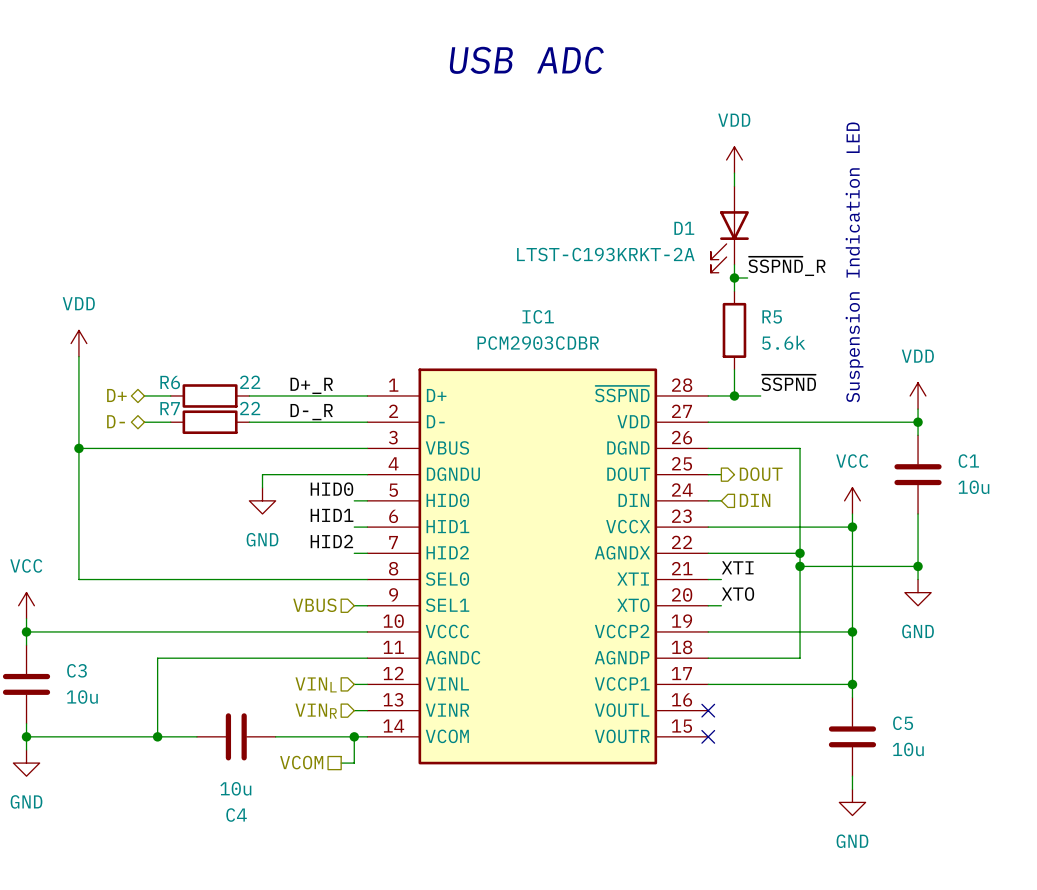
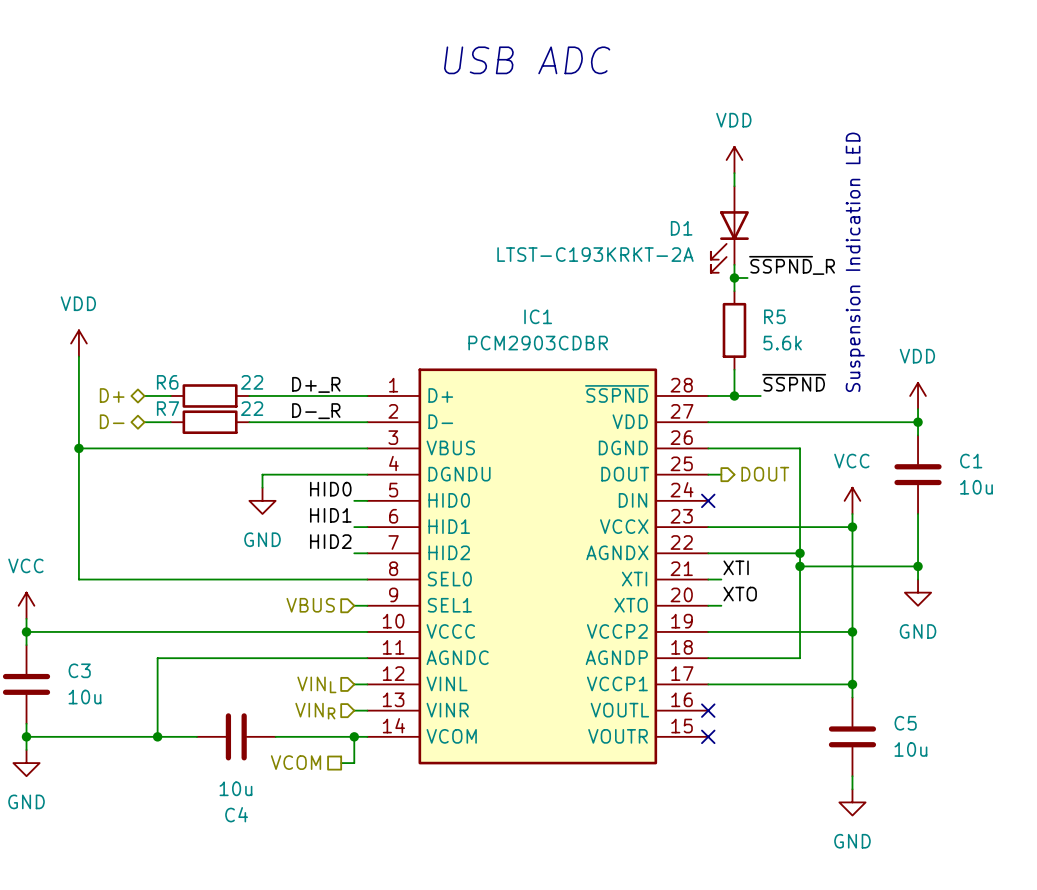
wire: (708, 500) (721, 500) -> none
no-connect mark: none -> (708, 500)
hierarchical label: DIN (755, 500) -> none

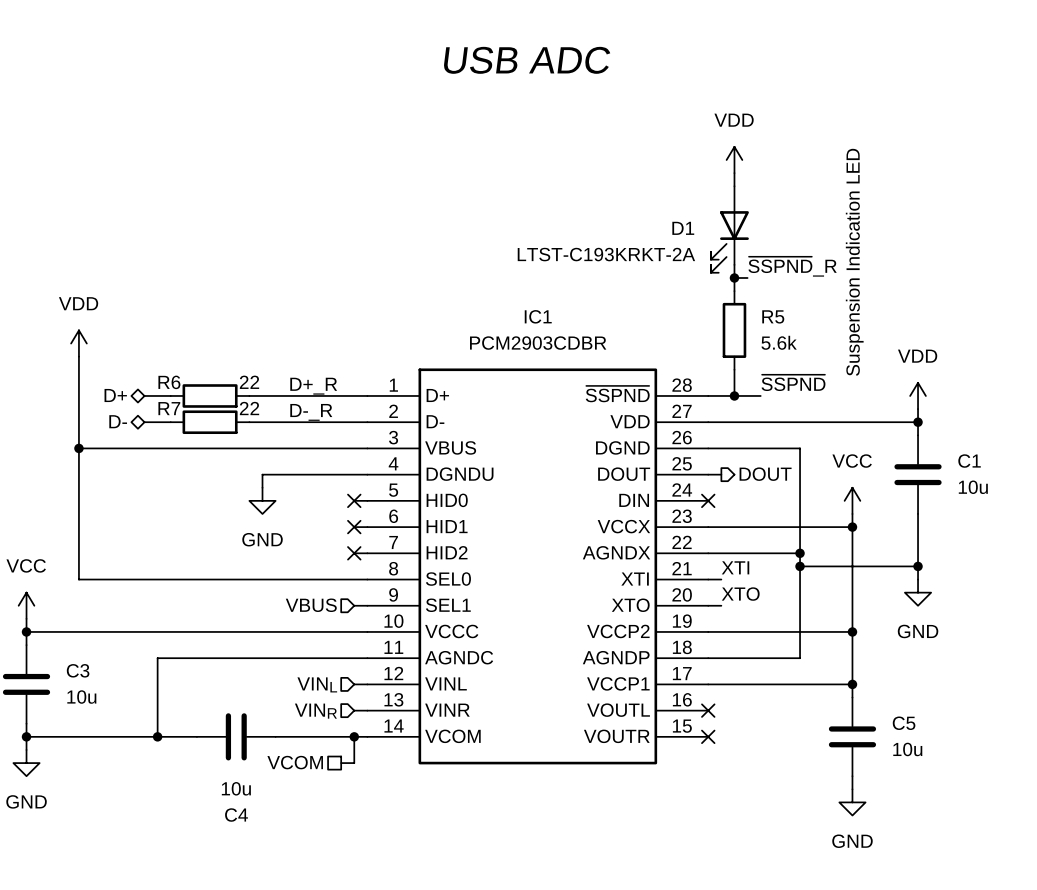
label: HID0 (330, 489) -> none
no-connect mark: none -> (354, 500)
label: HID1 (330, 515) -> none
no-connect mark: none -> (354, 527)
label: HID2 (330, 541) -> none
no-connect mark: none -> (354, 553)

